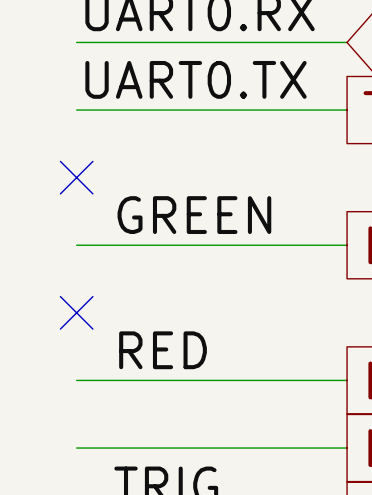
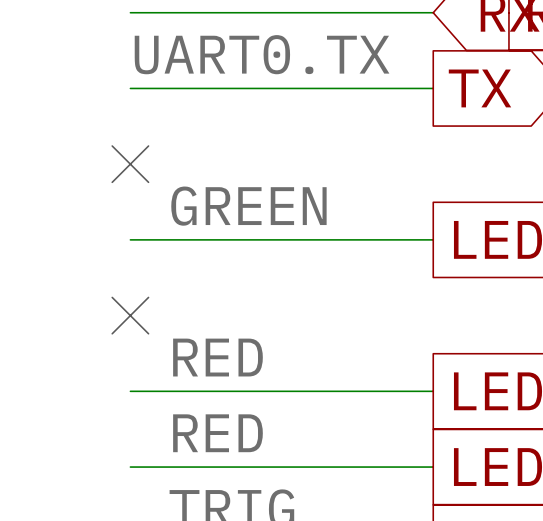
label: none -> RED (217, 433)

